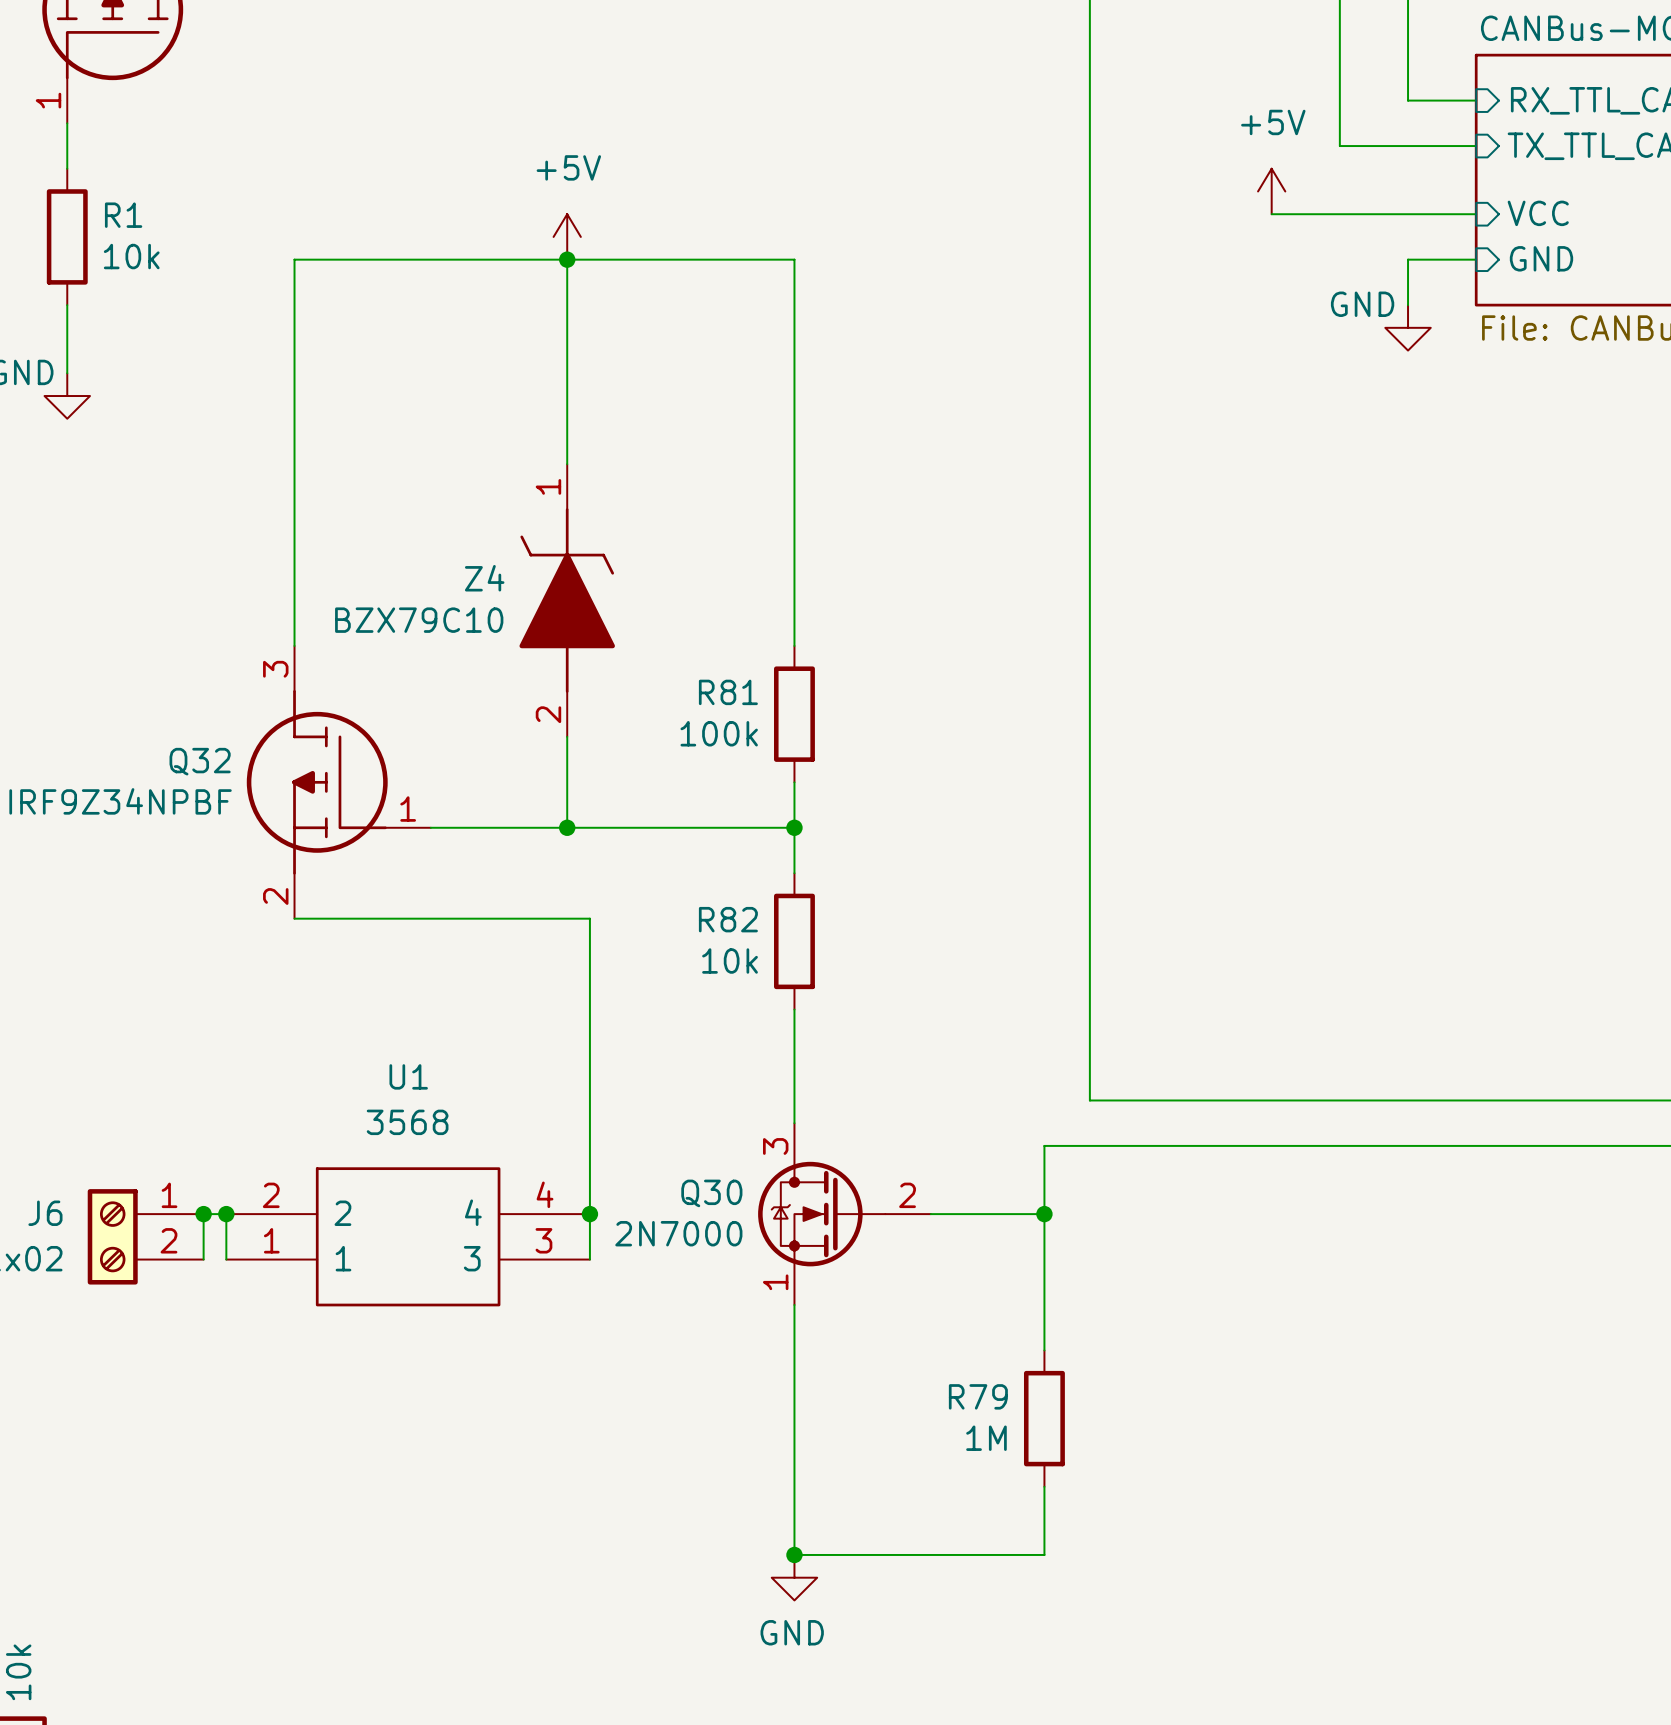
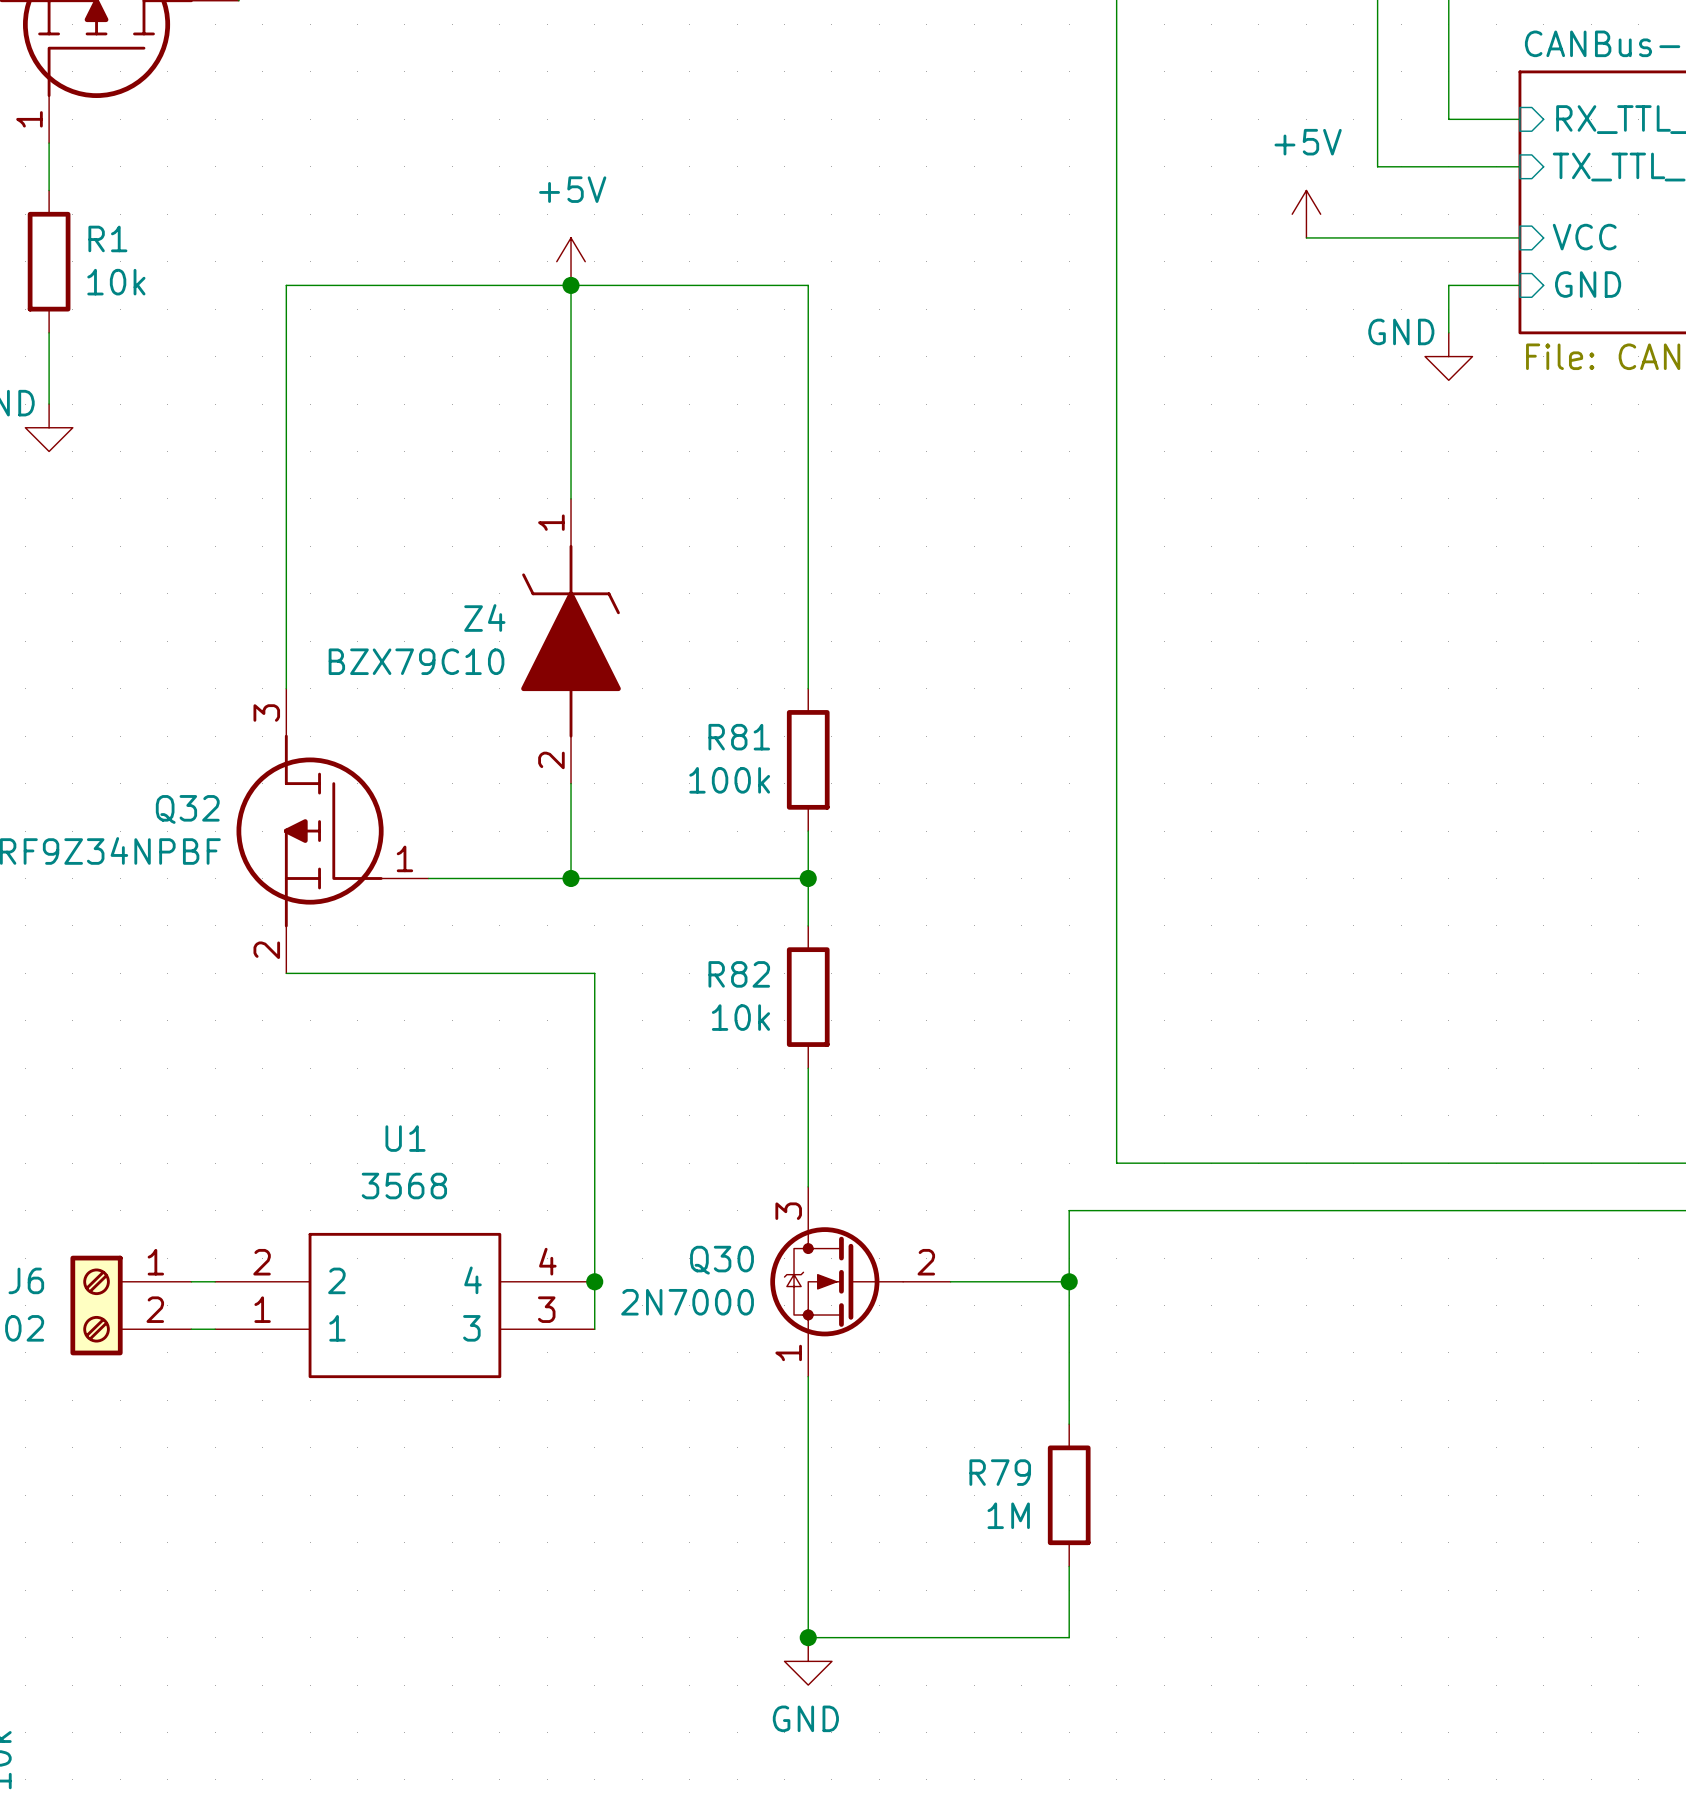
wire: (203, 1214) (203, 1259) -> (215, 1329) (191, 1329)
junction: (203, 1214) -> none
wire: (226, 1214) (226, 1259) -> none
junction: (226, 1214) -> none

